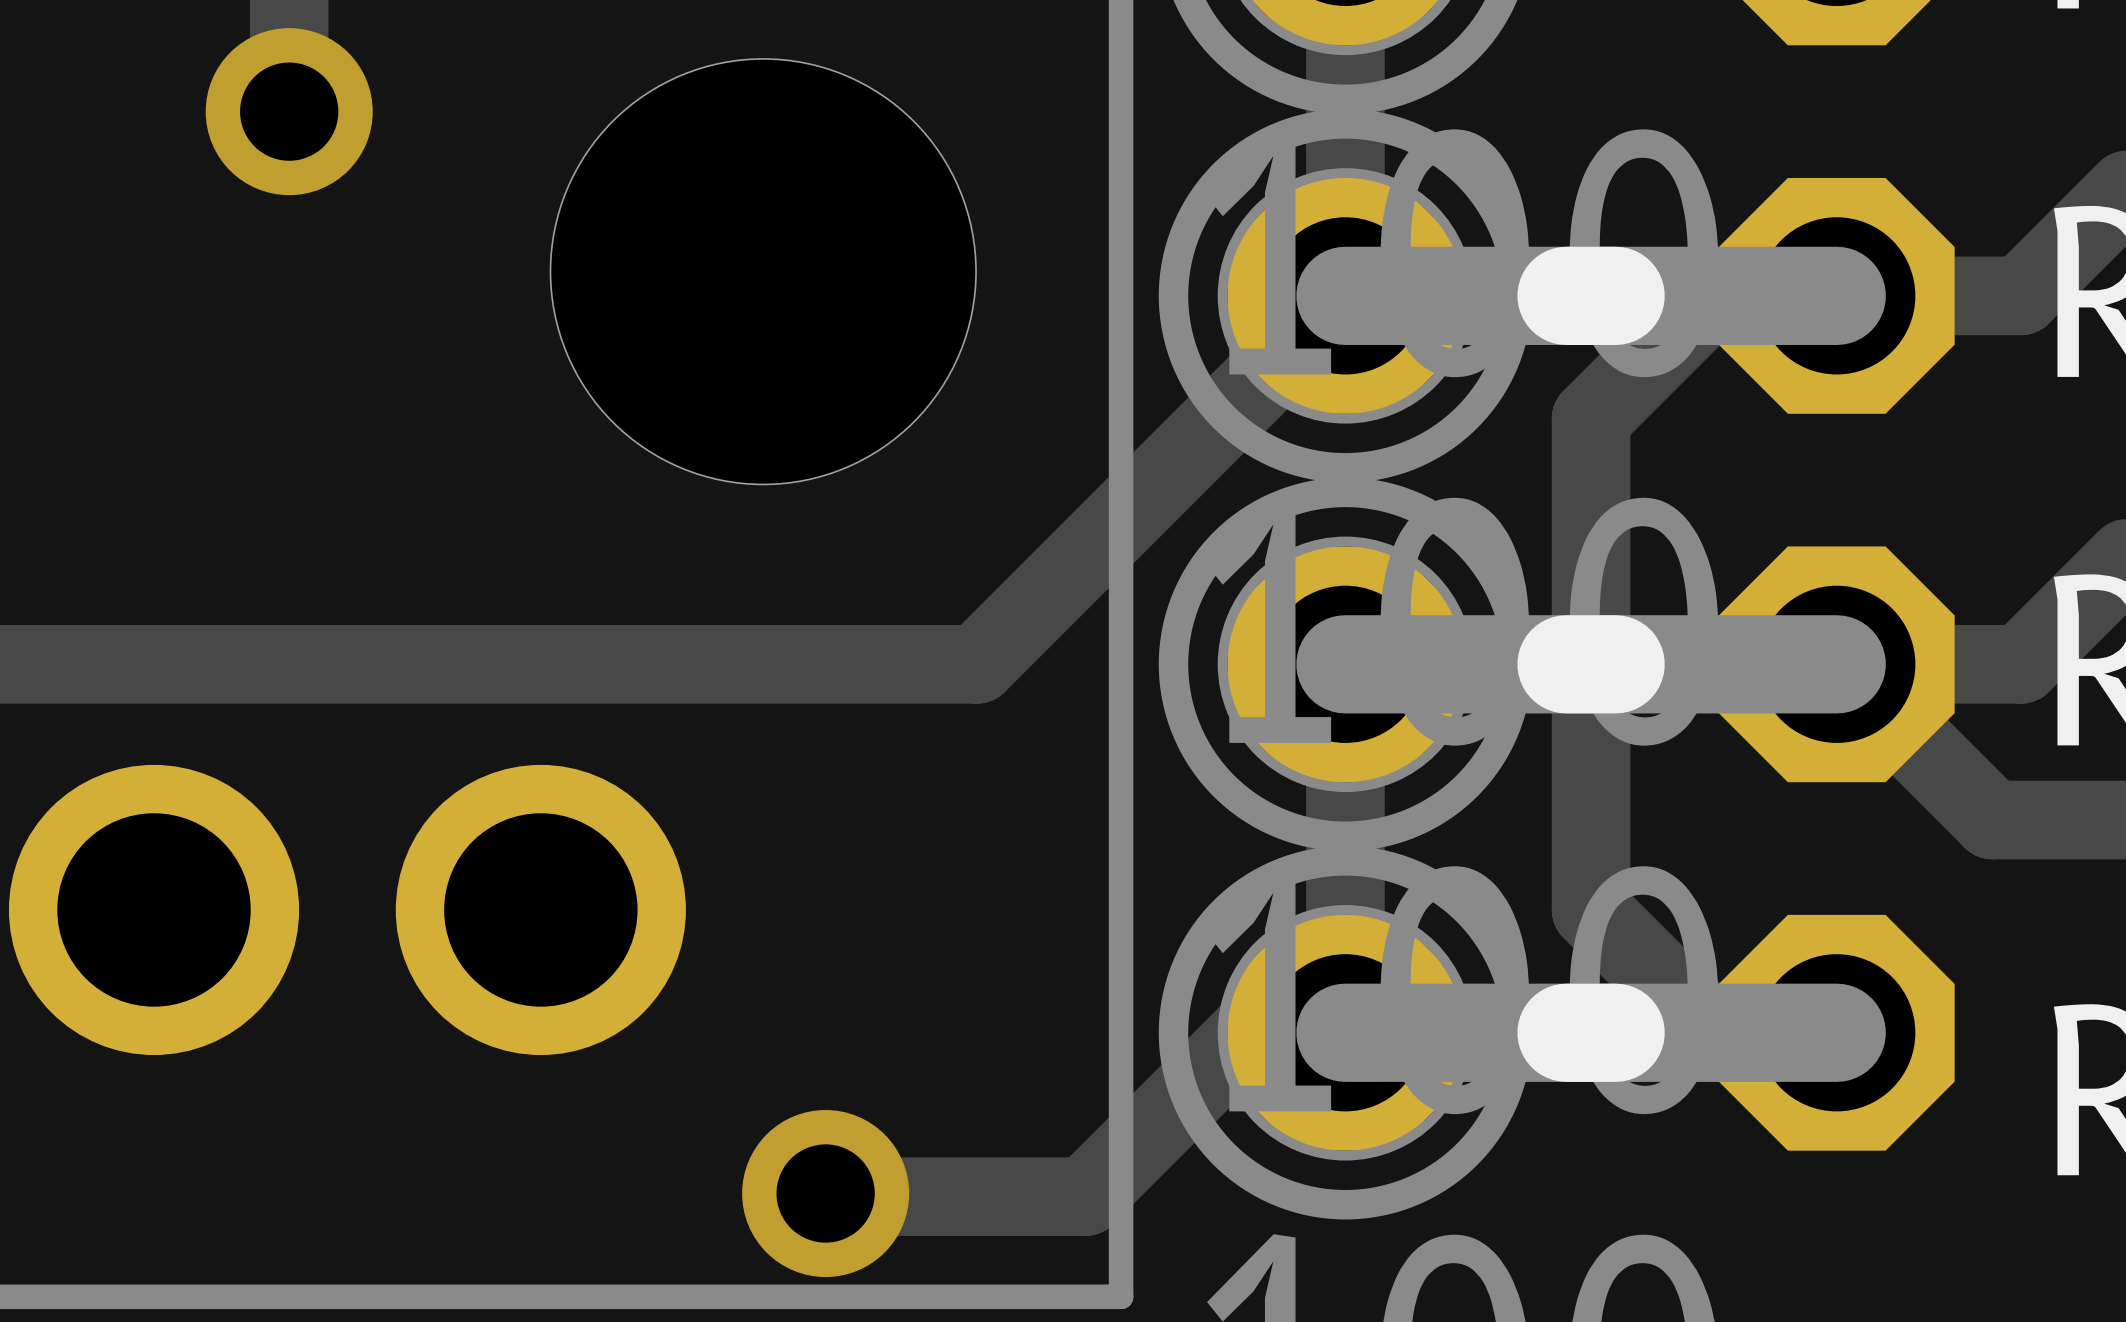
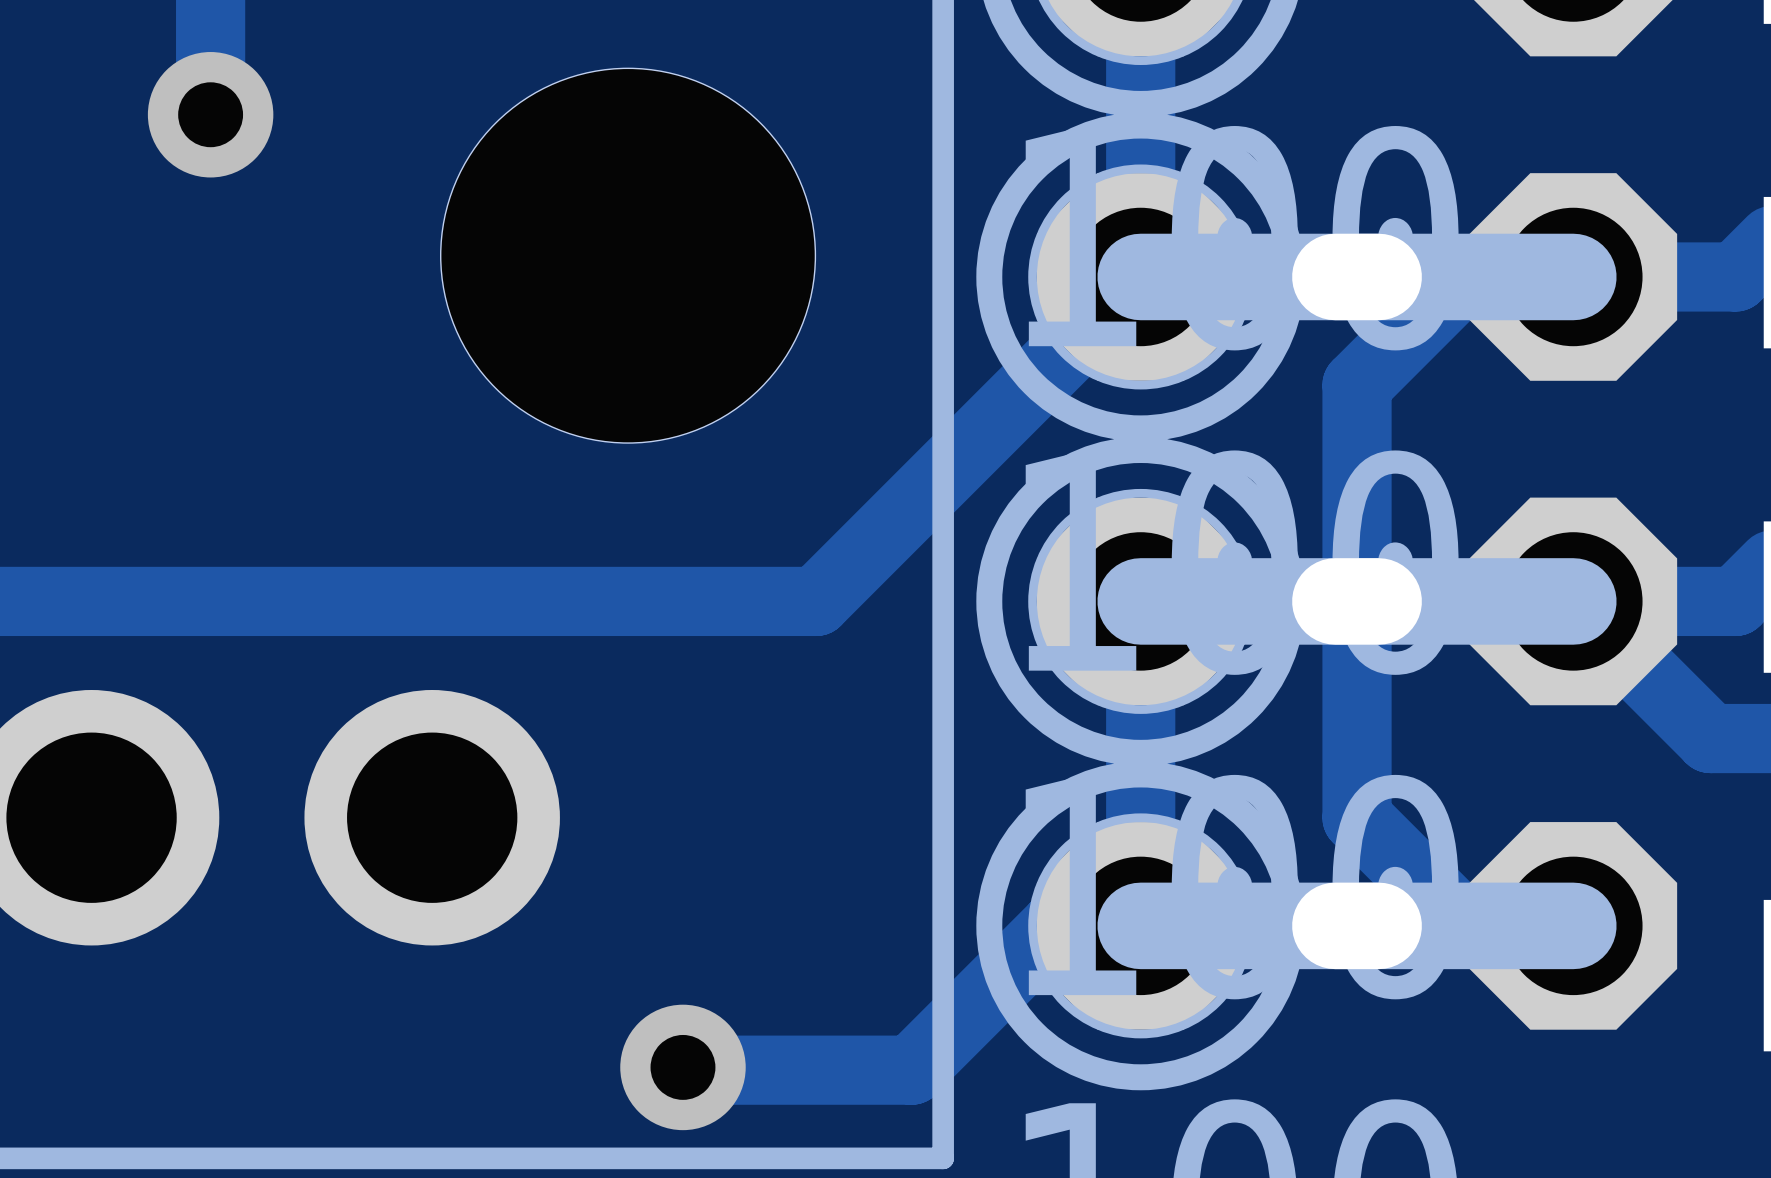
via size: [205, 28, 373, 196] -> [147, 52, 274, 178]
via size: [742, 1110, 910, 1278] -> [620, 1004, 746, 1131]

